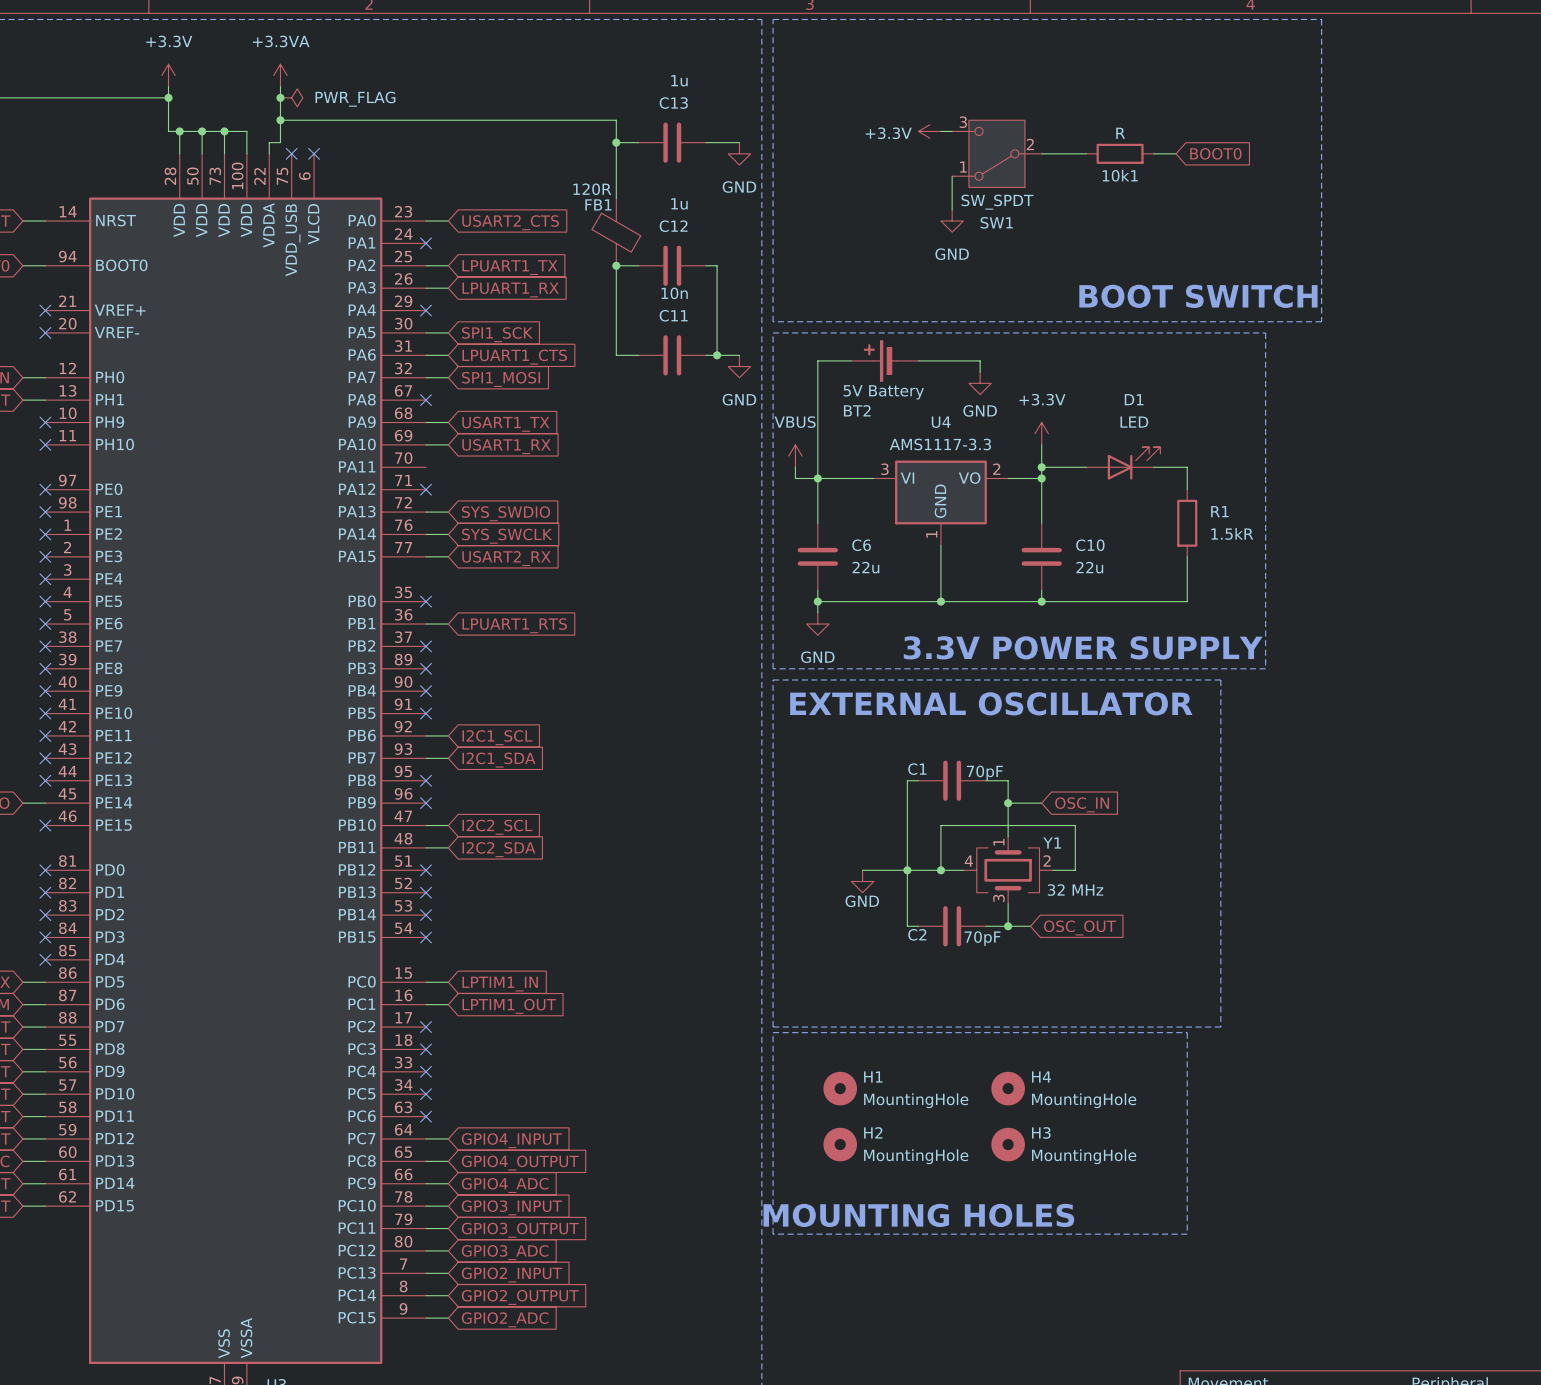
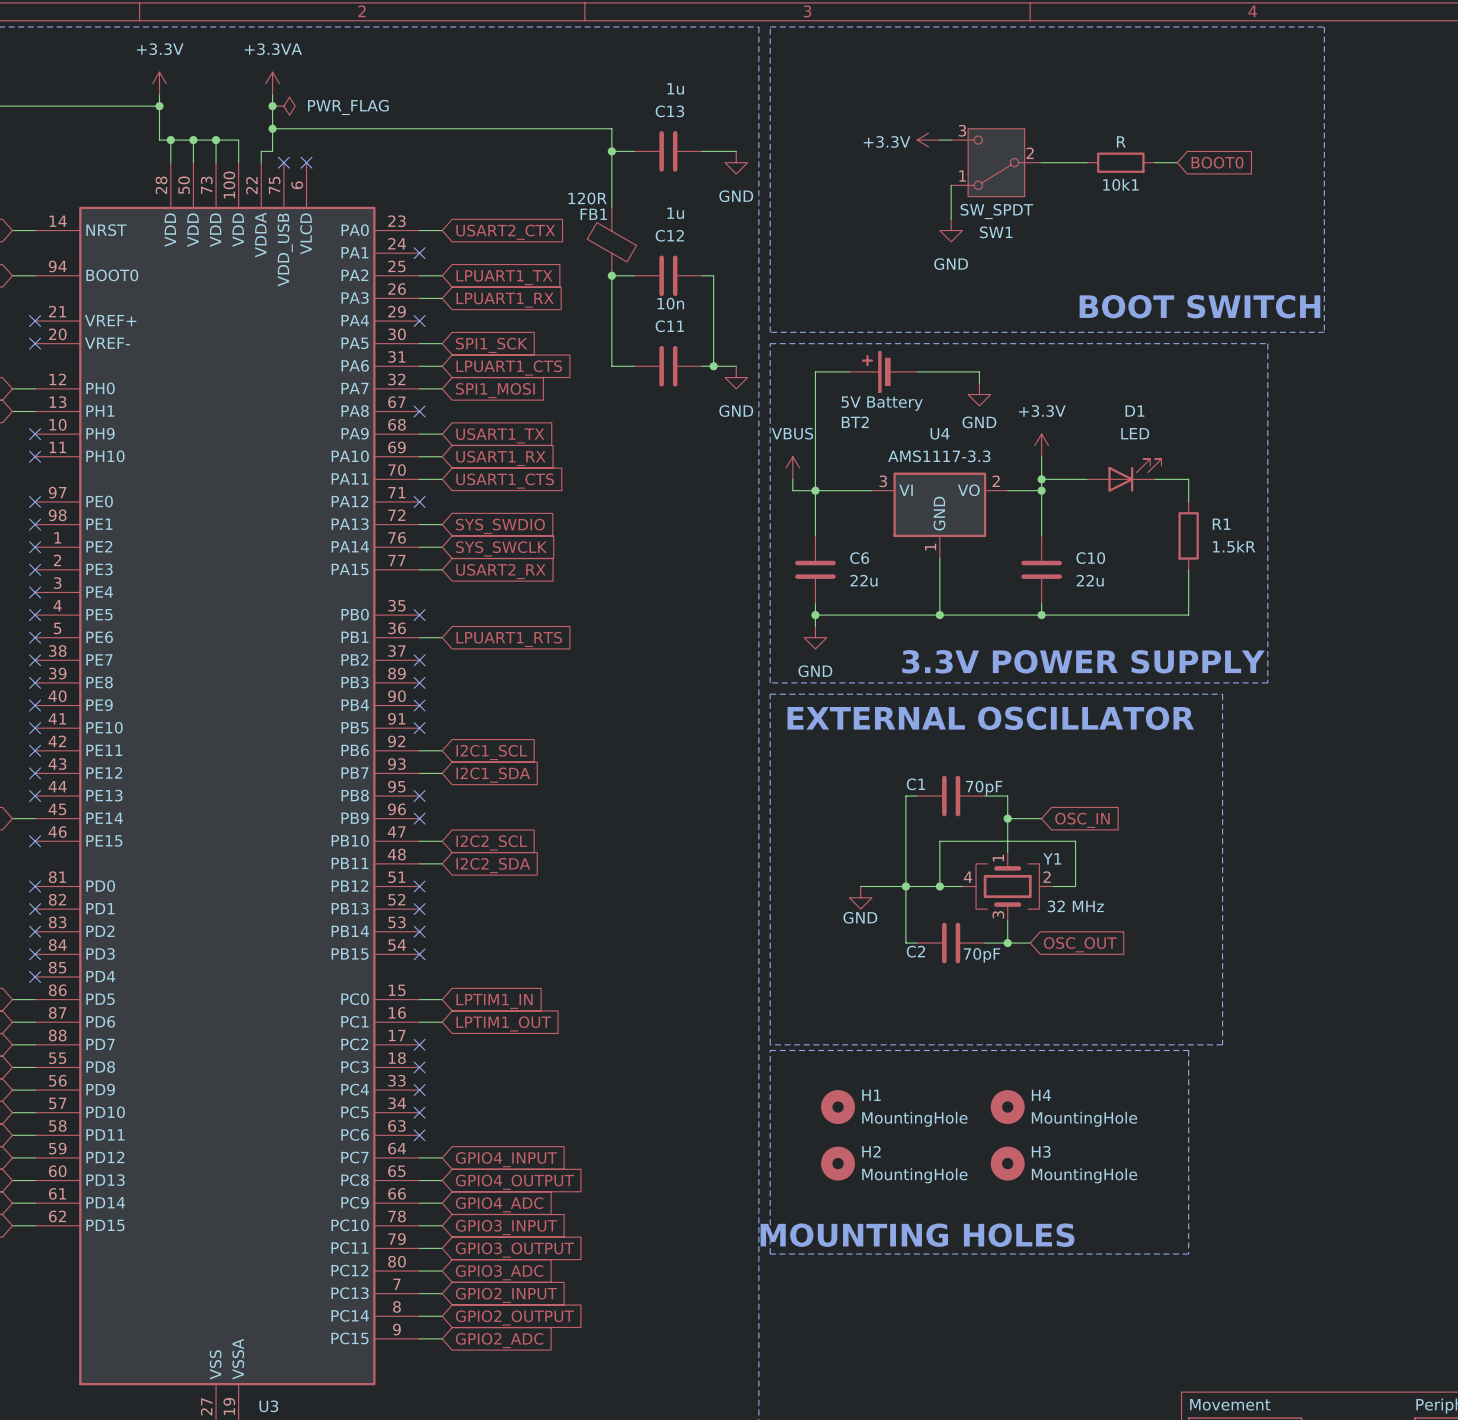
global label: USART2_CTS (510, 222) -> USART2_CTX (505, 232)
wire: none -> (419, 479) (442, 479)
global label: none -> USART1_CTS (505, 481)

